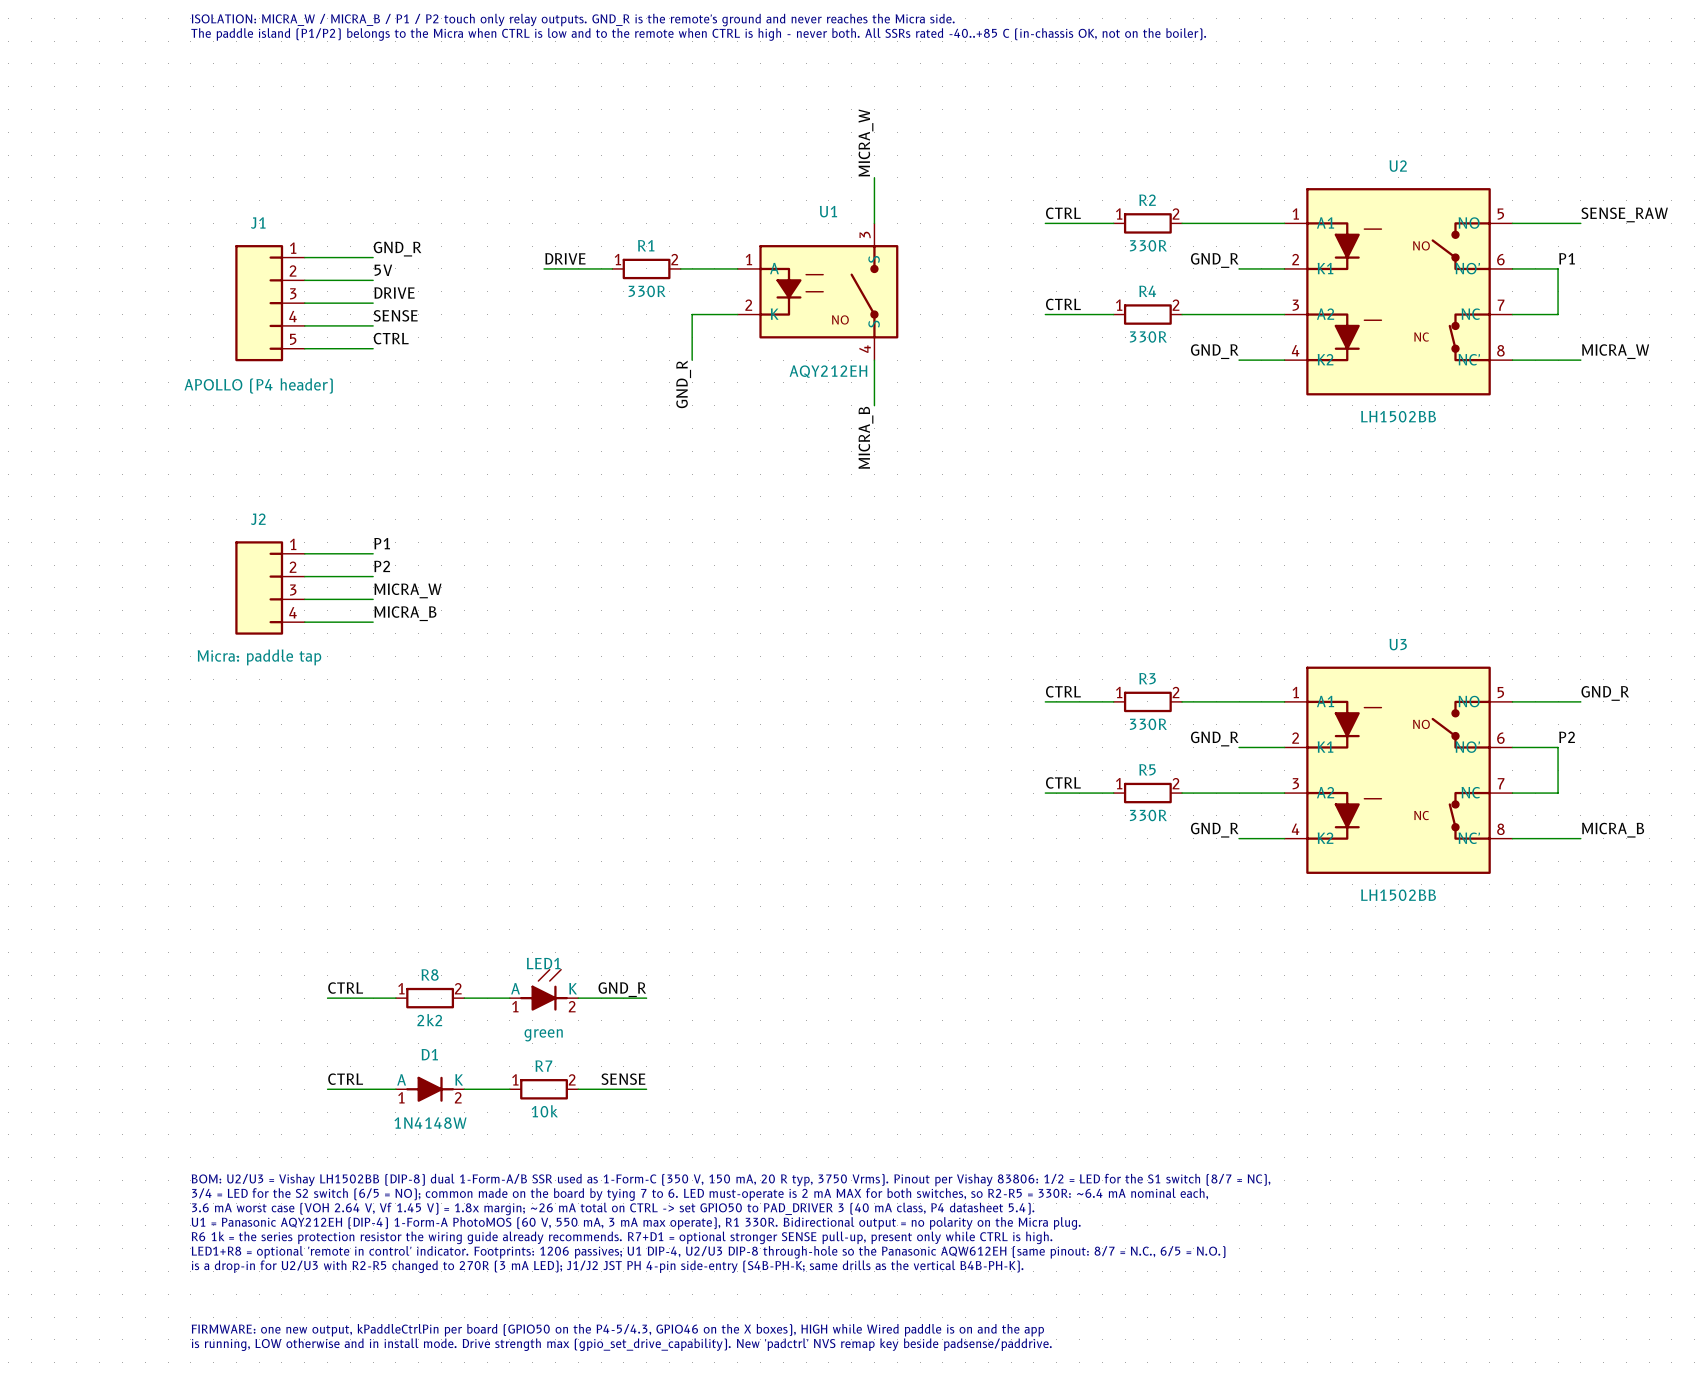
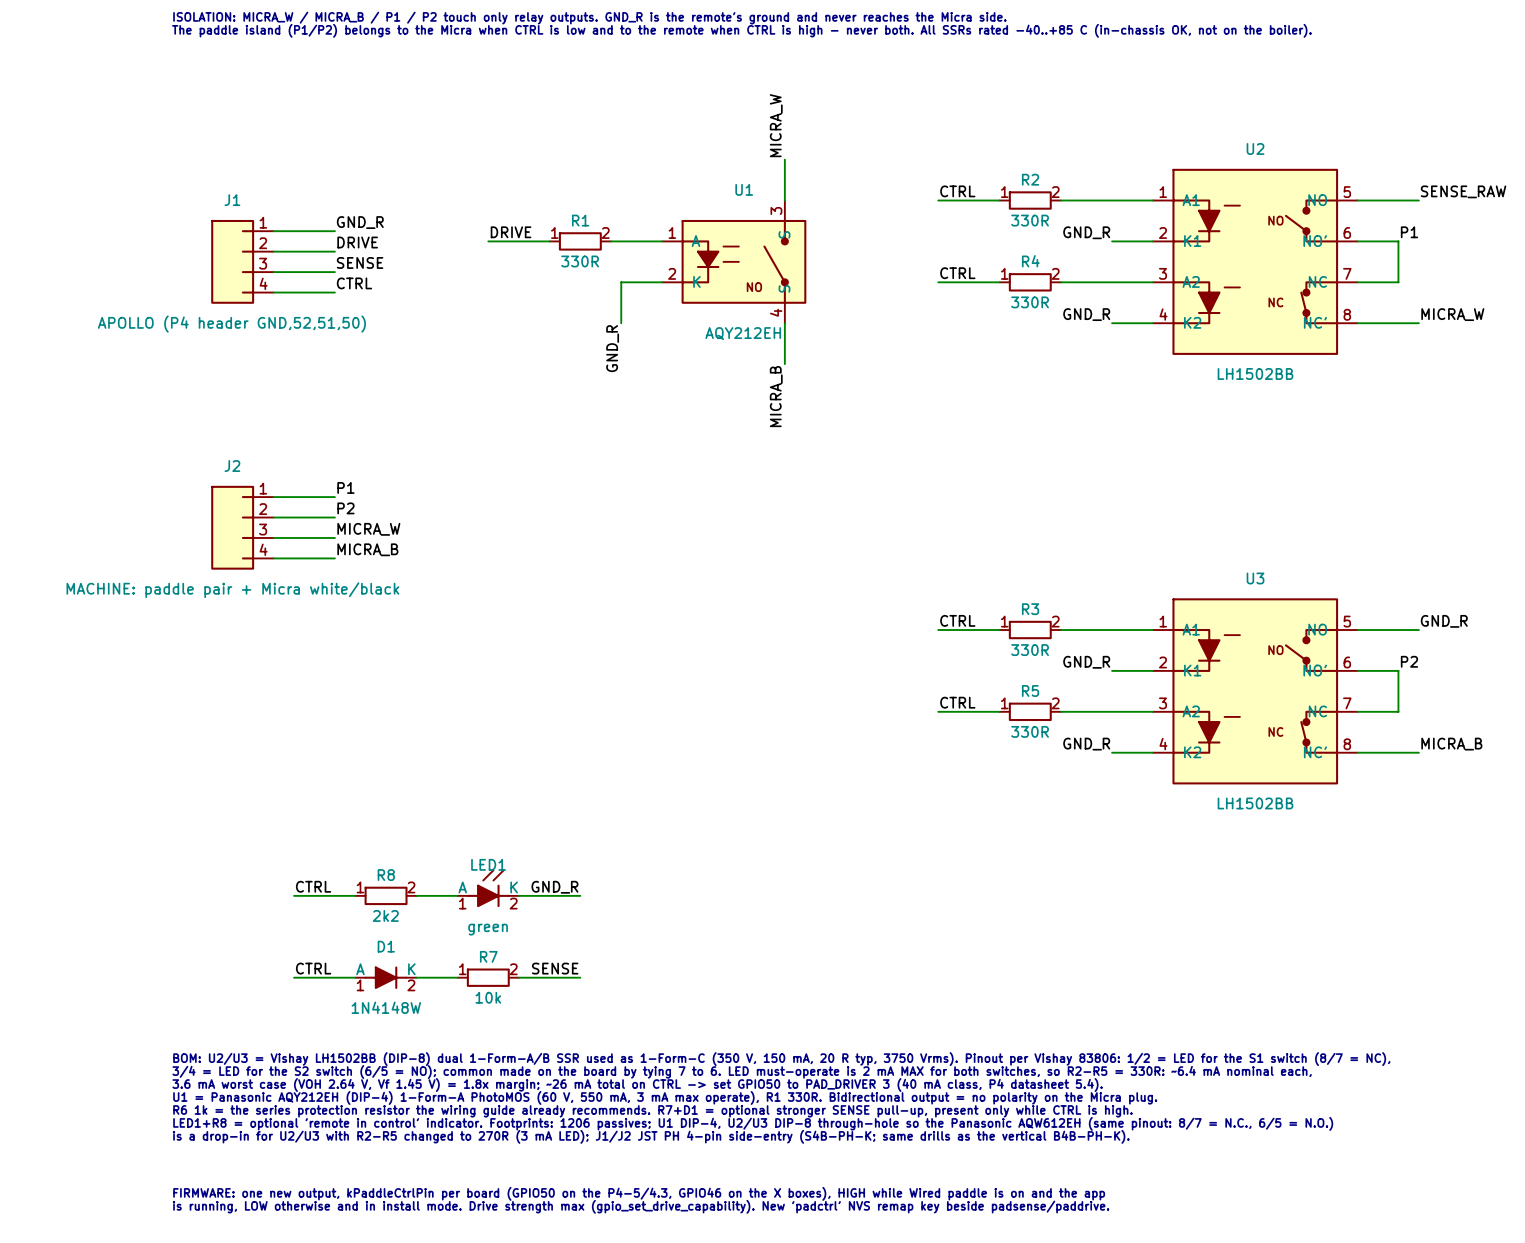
J1 symbol: [235, 245, 305, 362] -> [211, 219, 274, 304]
label: 5V (383, 270) -> DRIVE (357, 242)
label: DRIVE (394, 293) -> SENSE (360, 262)
label: SENSE (395, 315) -> CTRL (354, 283)
label: CTRL (391, 338) -> none
wire: (304, 348) (373, 348) -> none
J1 value: APOLLO (P4 header) (258, 385) -> APOLLO (P4 header GND,52,51,50) (231, 324)
J2 value: Micra: paddle tap (259, 657) -> MACHINE: paddle pair + Micra white/black (232, 590)

